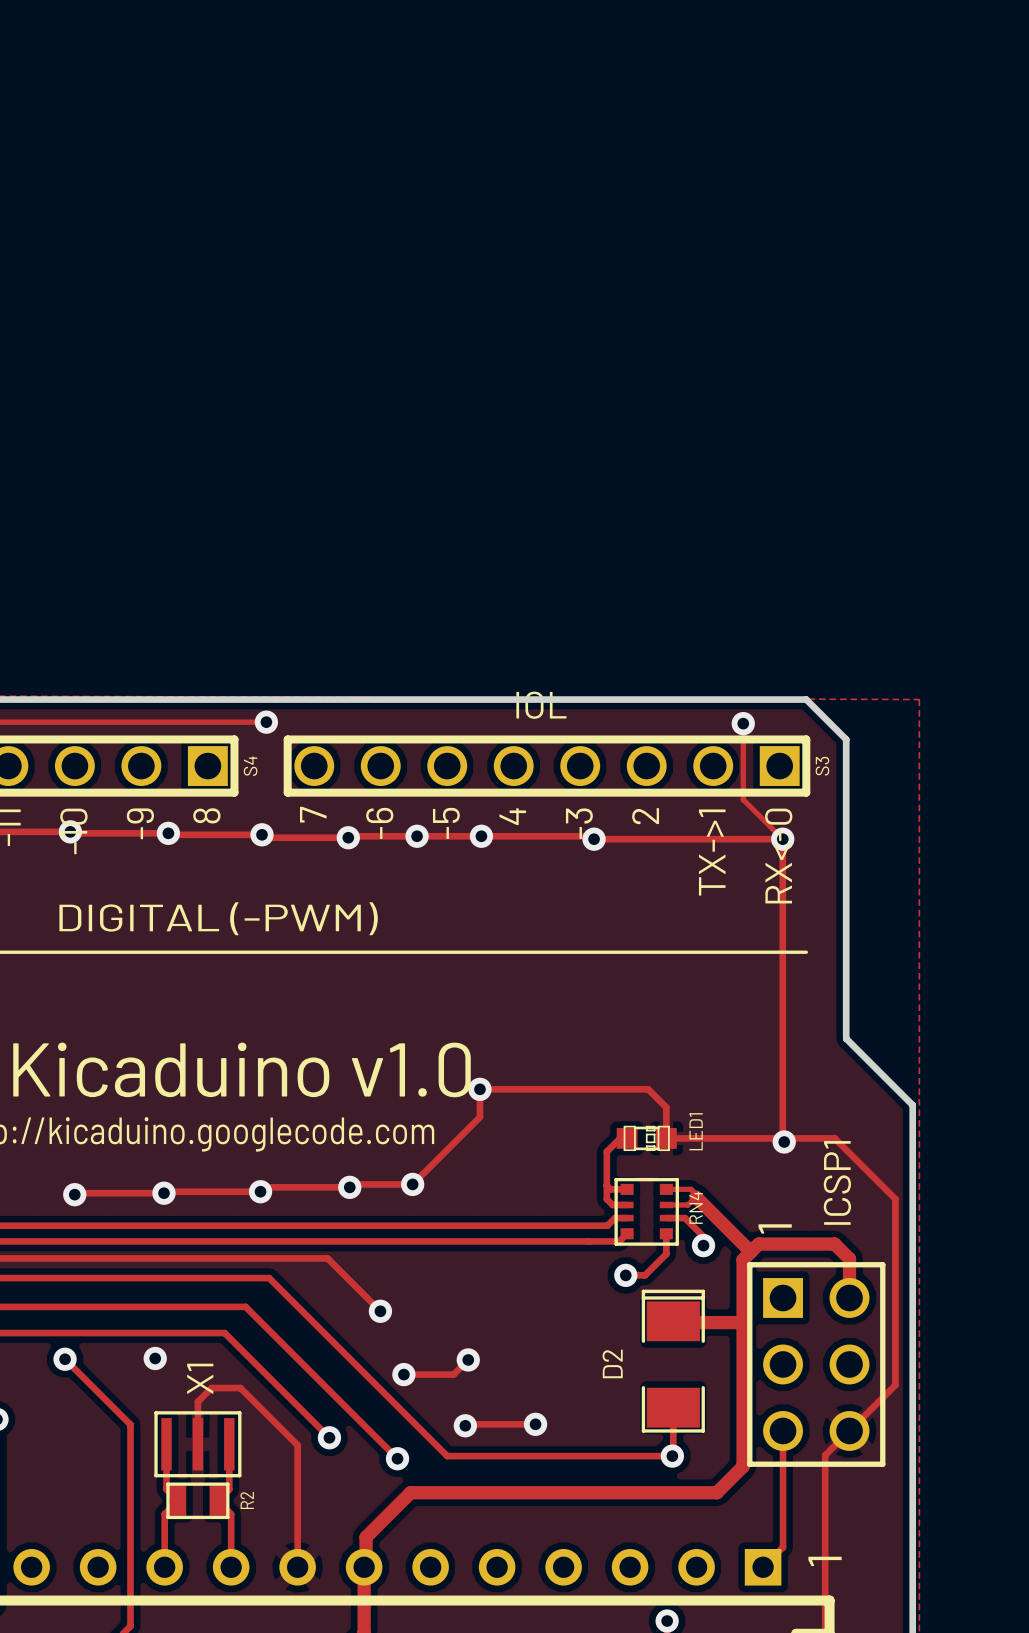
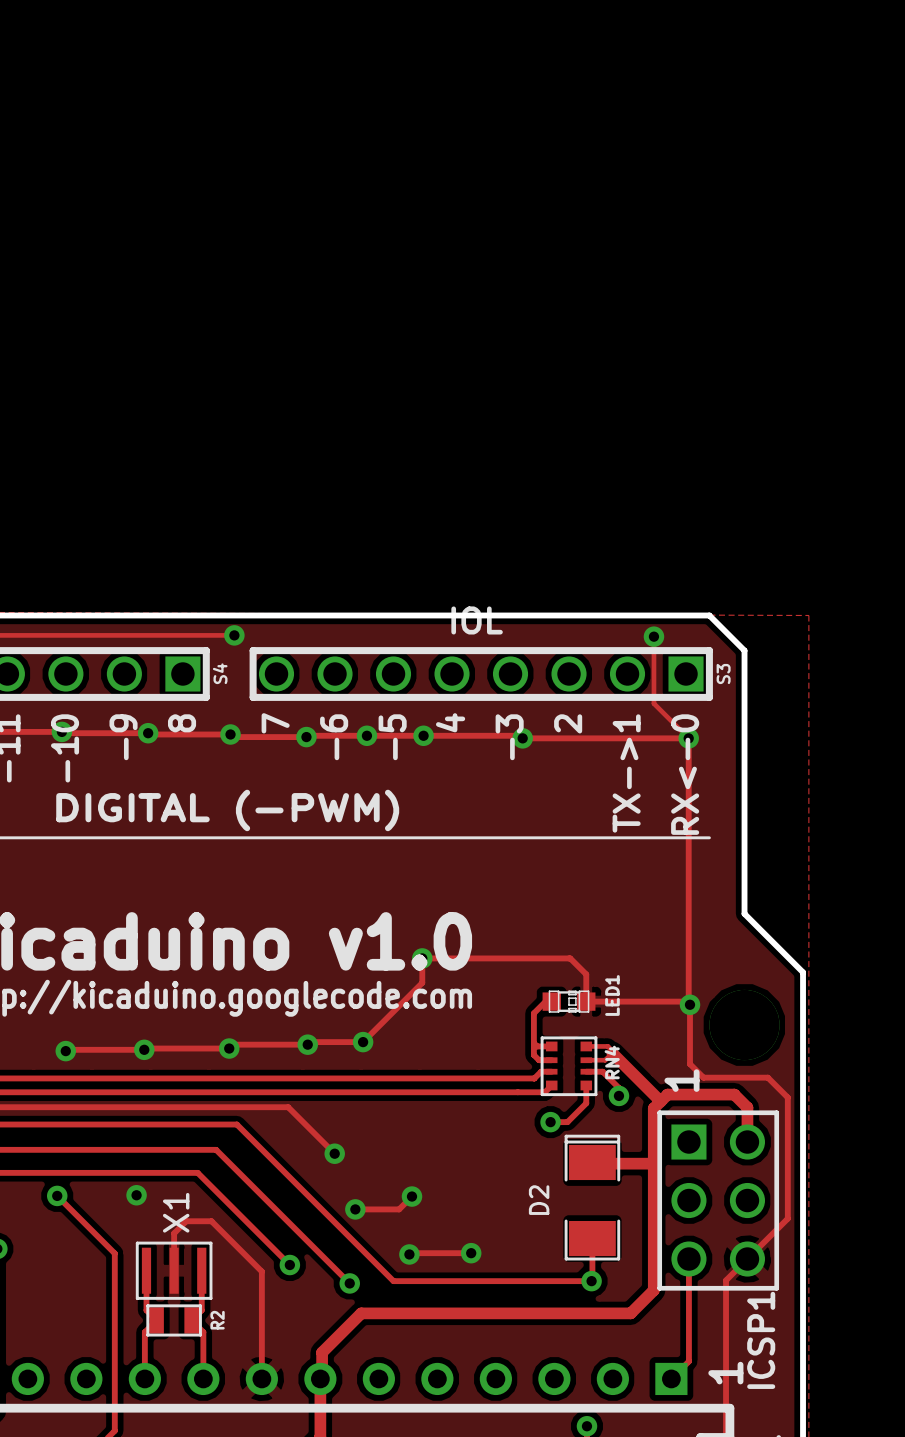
track: (780, 1138) (834, 1138) (895, 1199) (895, 1247) -> (690, 1004) (690, 1064) (703, 1077) (767, 1077) (787, 1097)
ICSP1 name position: ICSP1 (837, 1182) -> ICSP1 (761, 1340)

